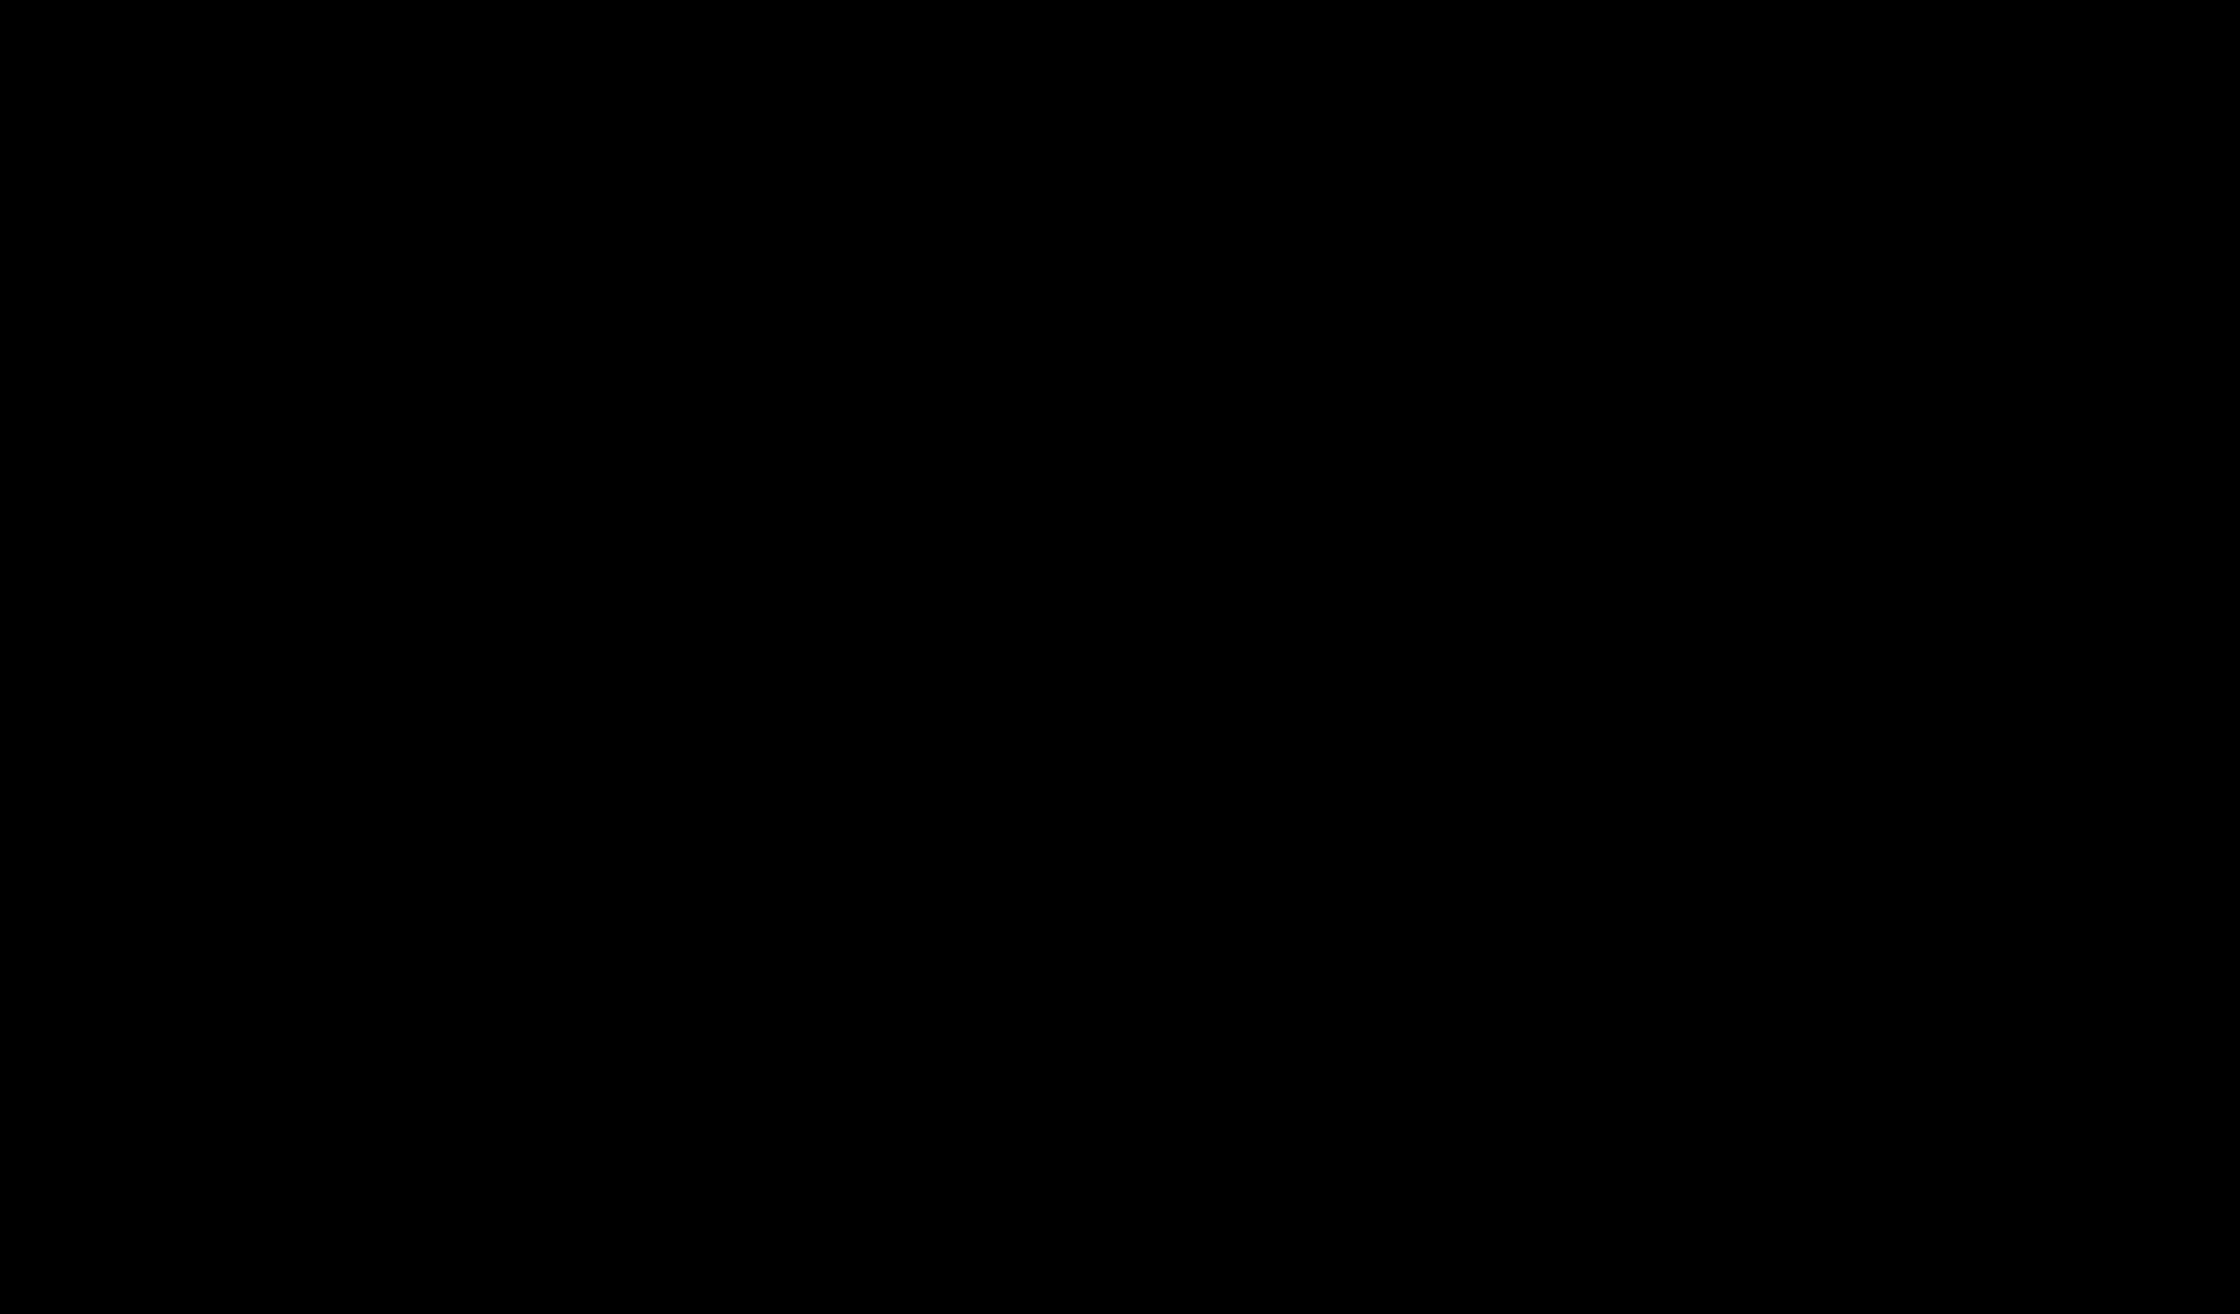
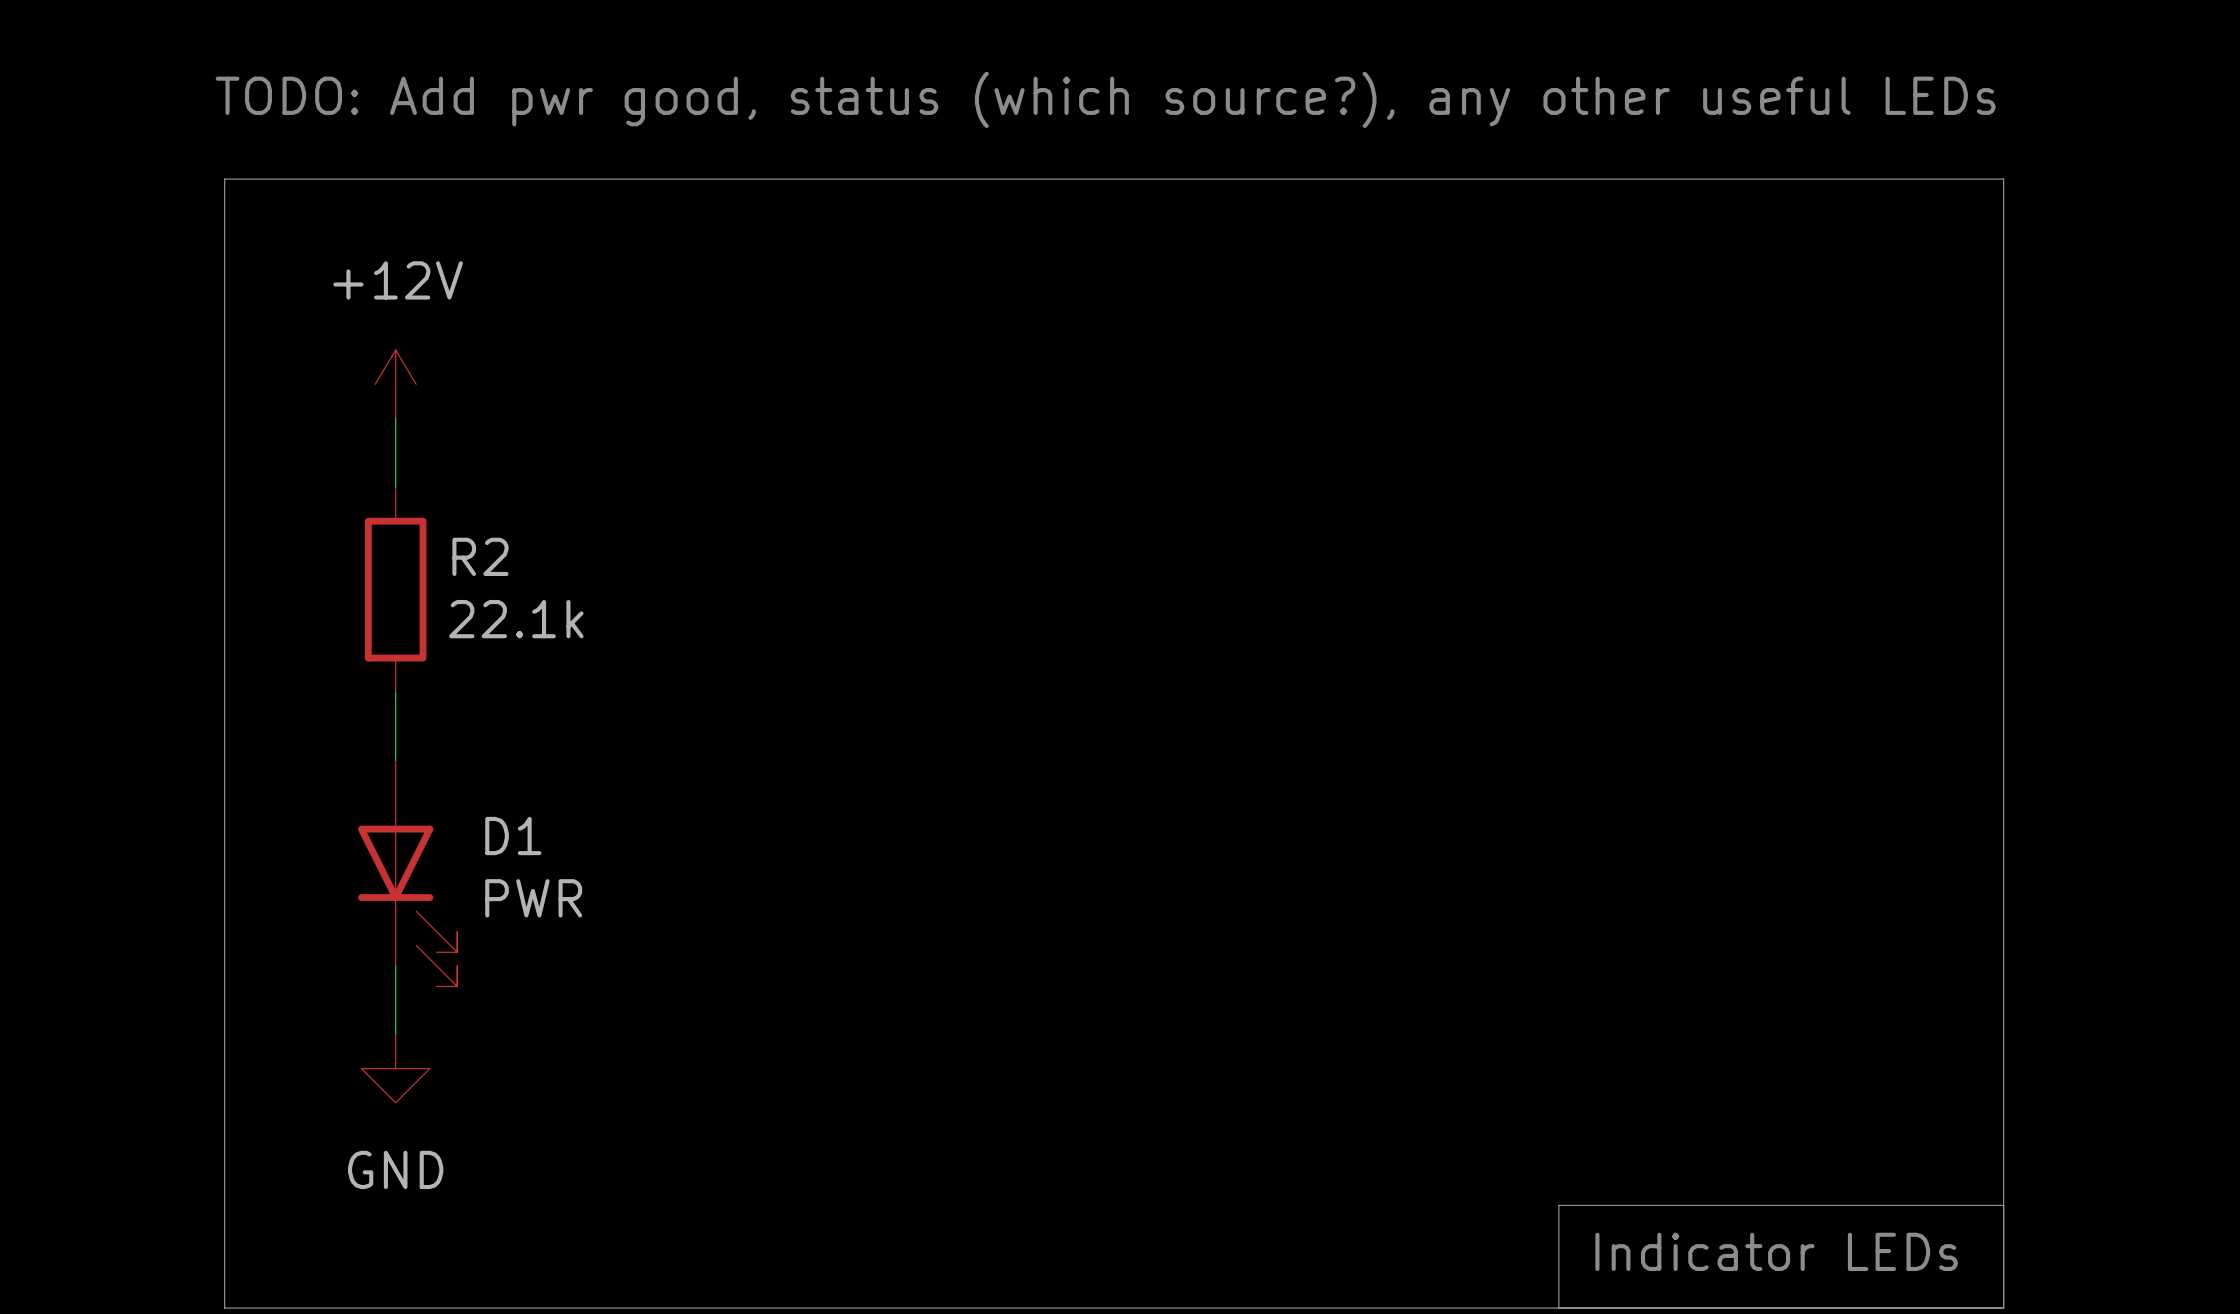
text: none -> TODO: Add pwr good, status (which source?), any other useful LEDs (1105, 99)
line: none -> (224, 179) (2003, 179) (2003, 1308) (224, 1308) (224, 179)
power symbol: none -> +12V (395, 384)
wire: none -> (395, 418) (395, 486)
R2: none -> 22.1k (395, 589)
wire: none -> (395, 692) (395, 760)
D1: none -> PWR (407, 873)
wire: none -> (395, 965) (395, 1034)
power symbol: none -> GND (395, 1068)
line: none -> (2003, 1205) (1558, 1205) (1558, 1308)
text: none -> Indicator LEDs (1776, 1251)

